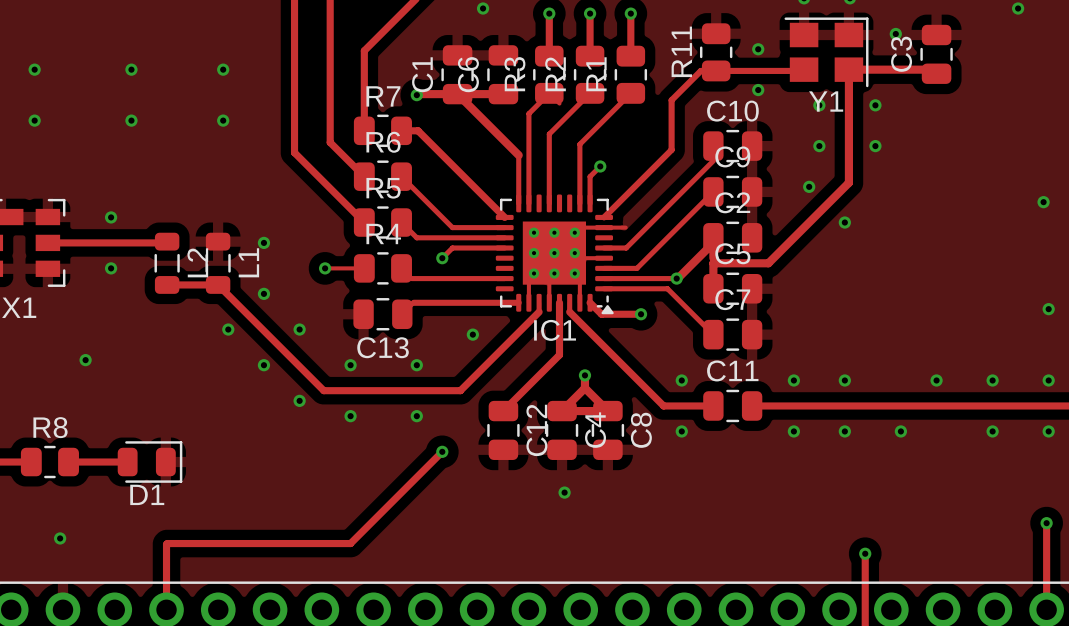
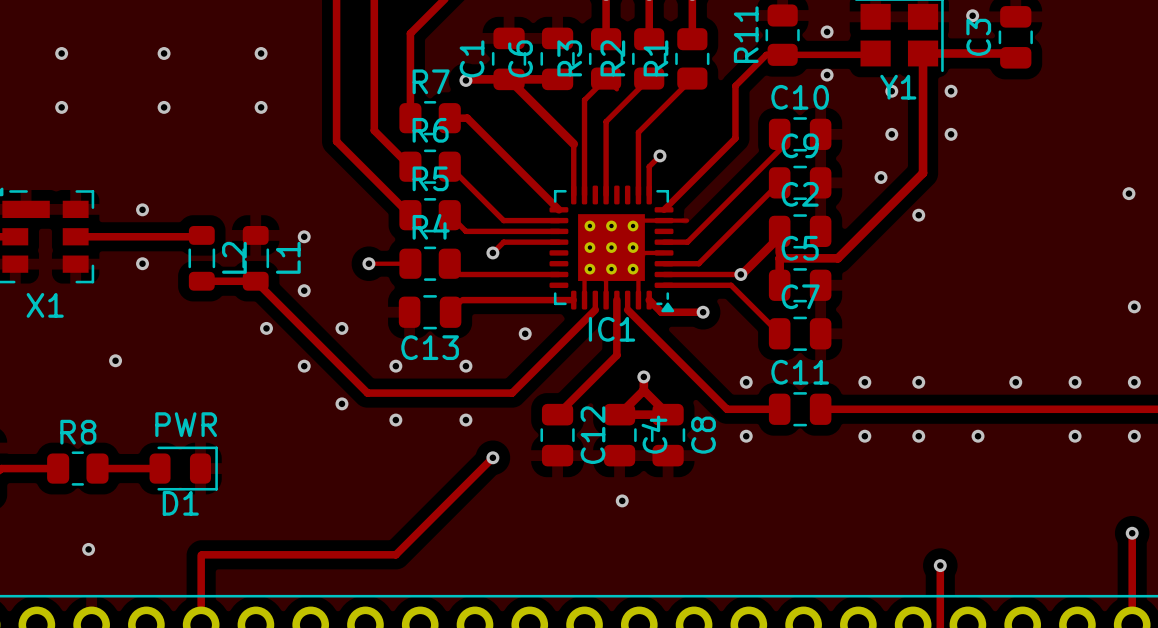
D1 value: none -> PWR (186, 424)

